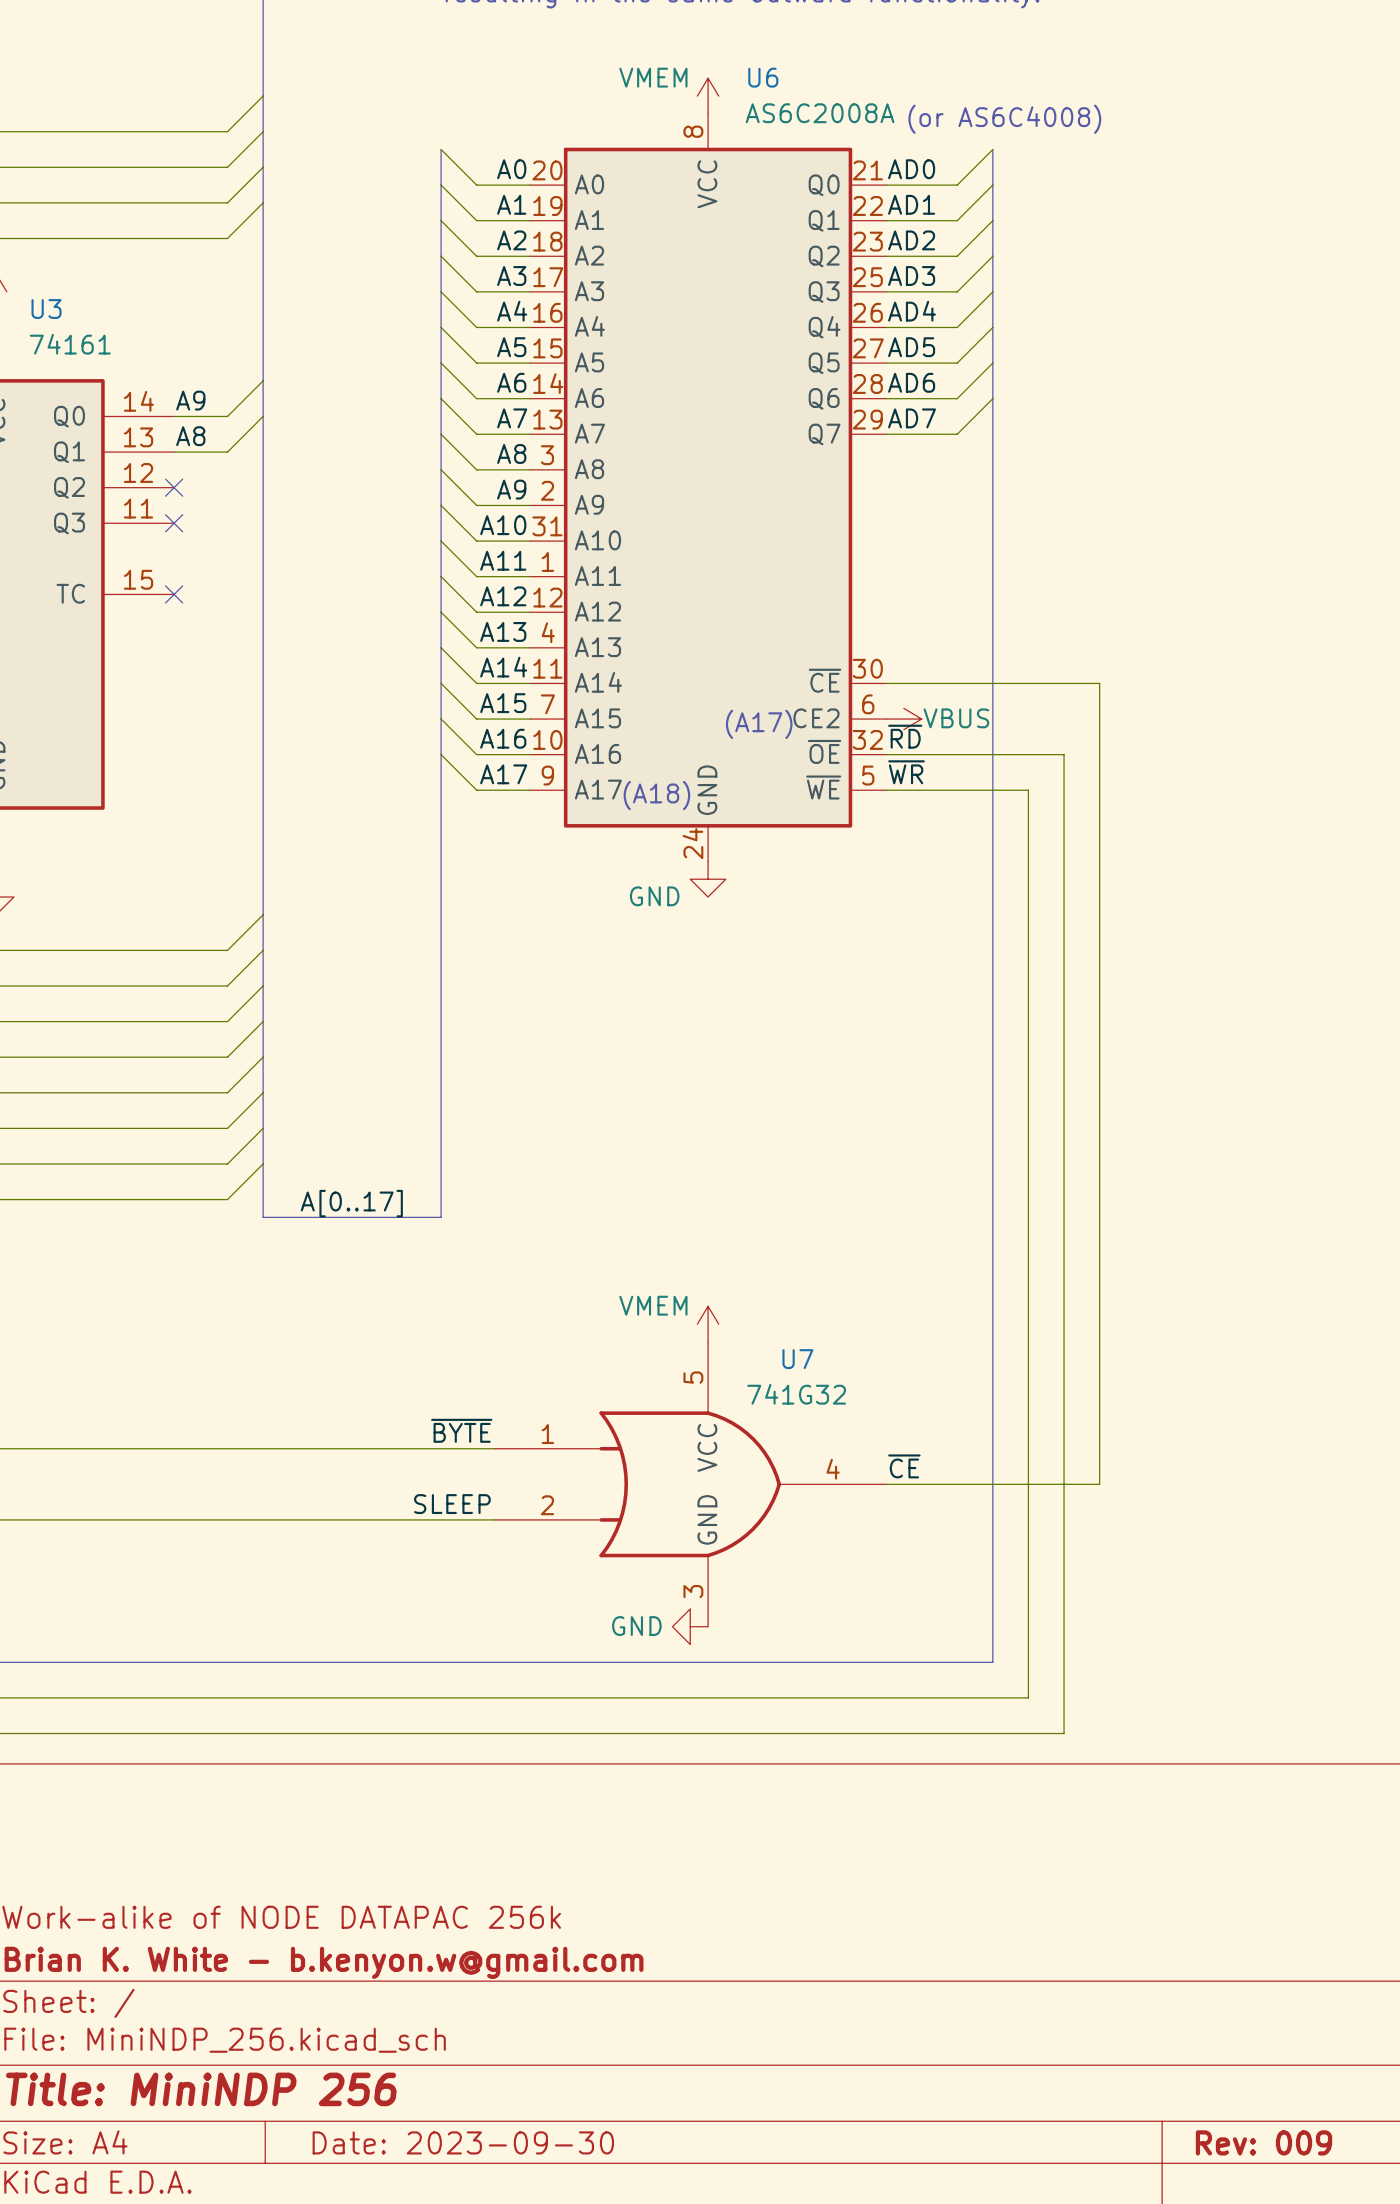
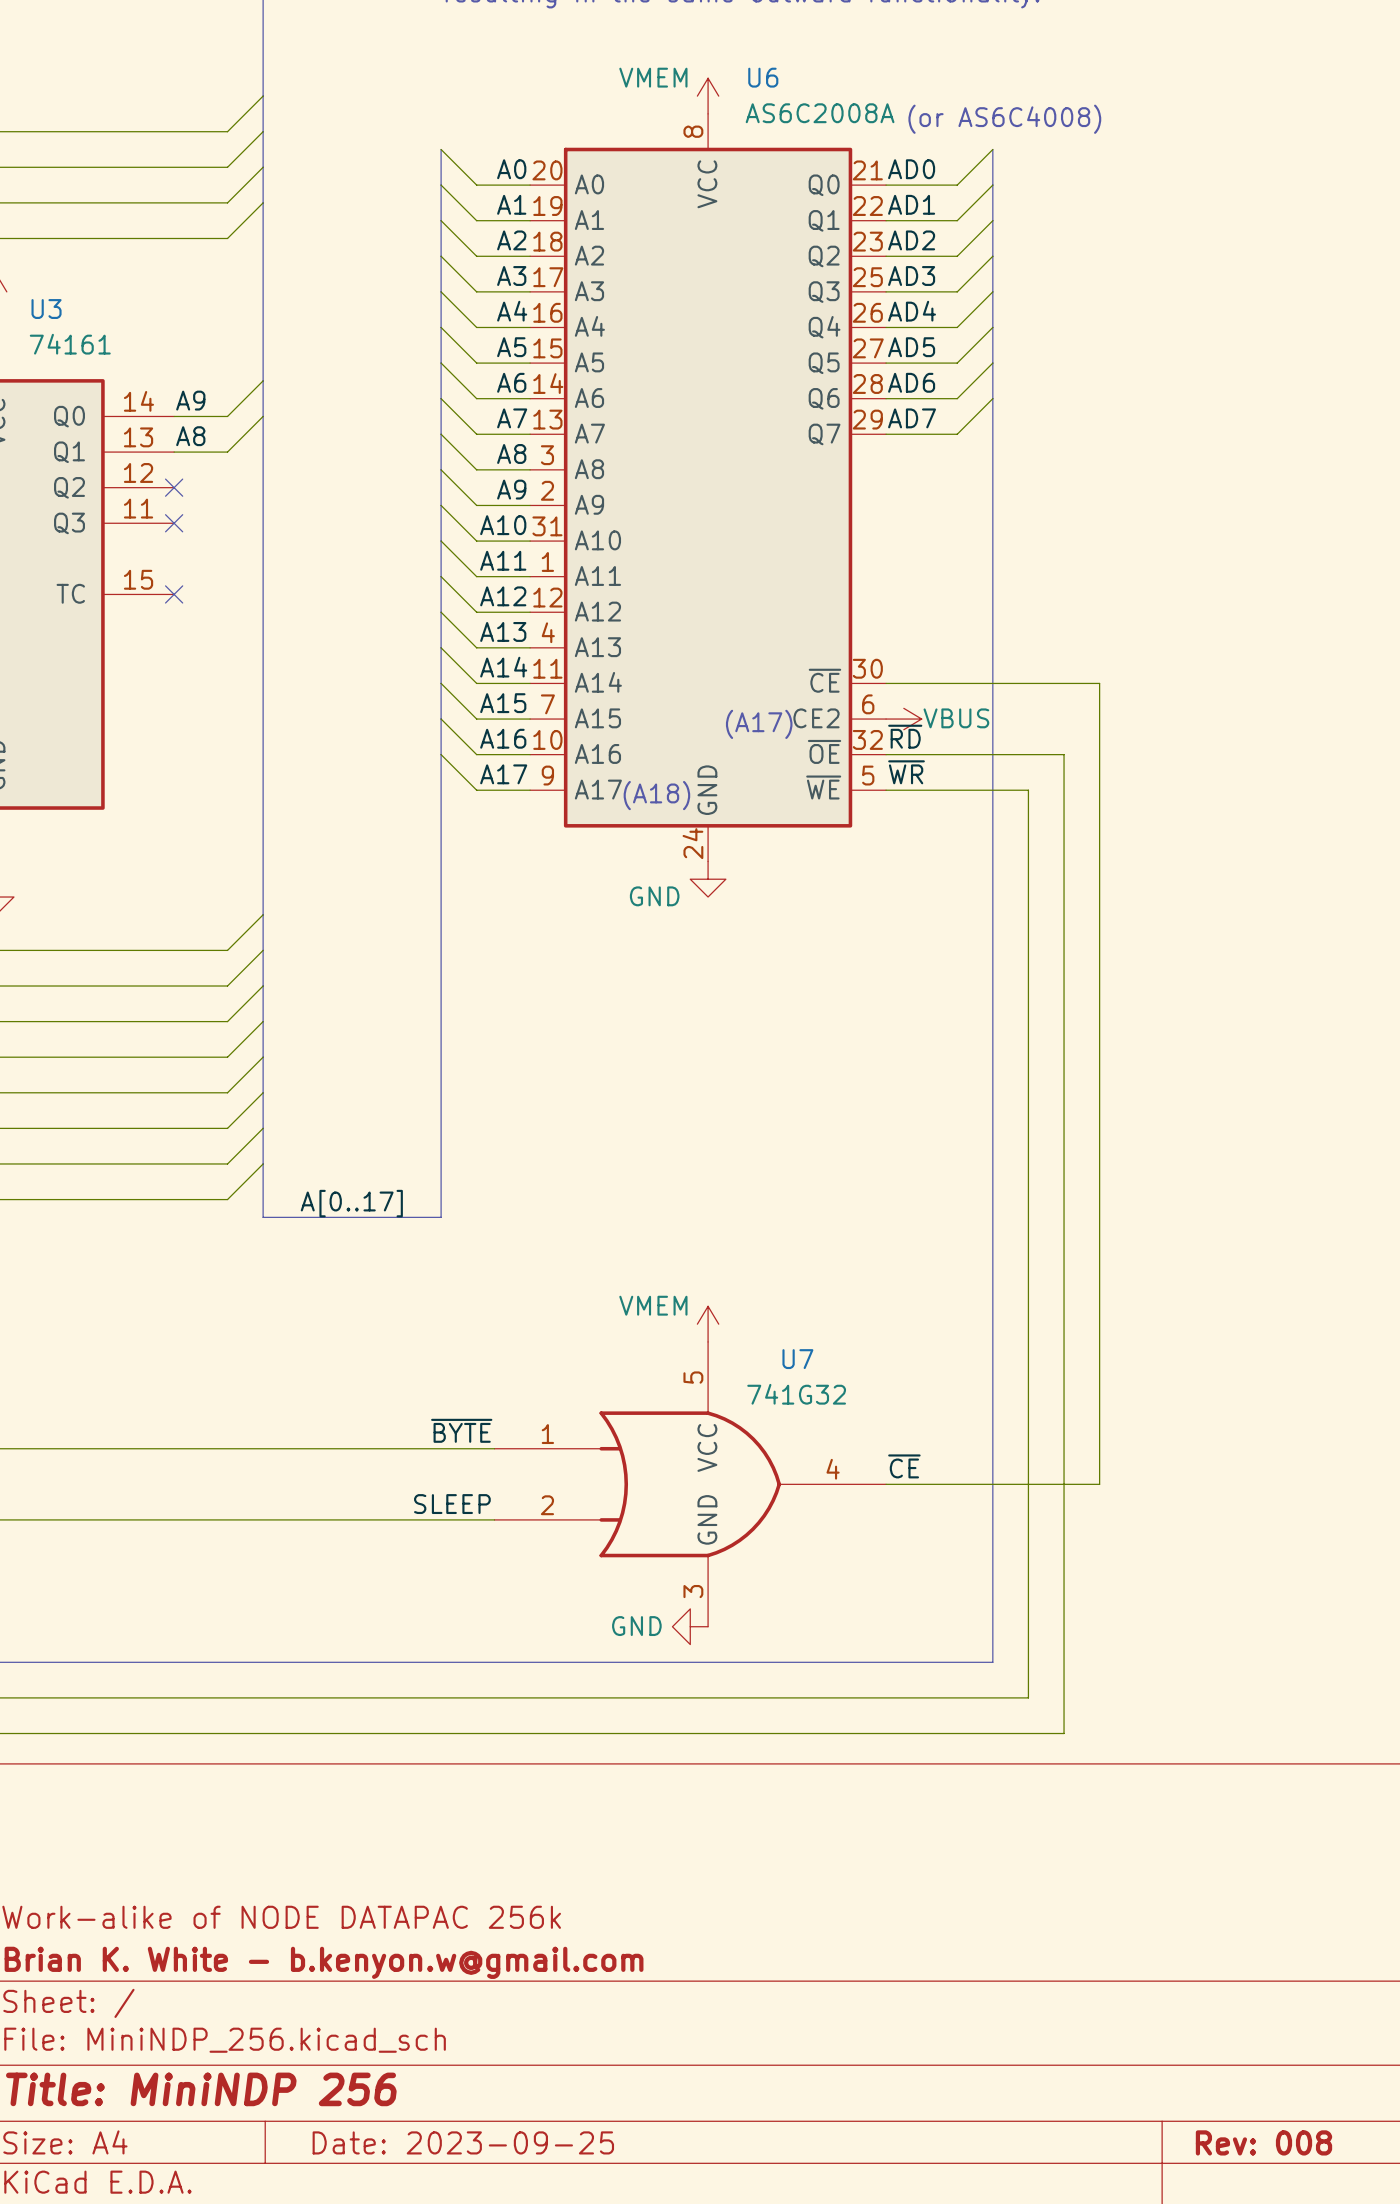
title block: Date: 2023-09-30 (463, 2142) -> Date: 2023-09-25 (463, 2142)
title block: Rev: 009 (1263, 2142) -> Rev: 008 (1263, 2142)

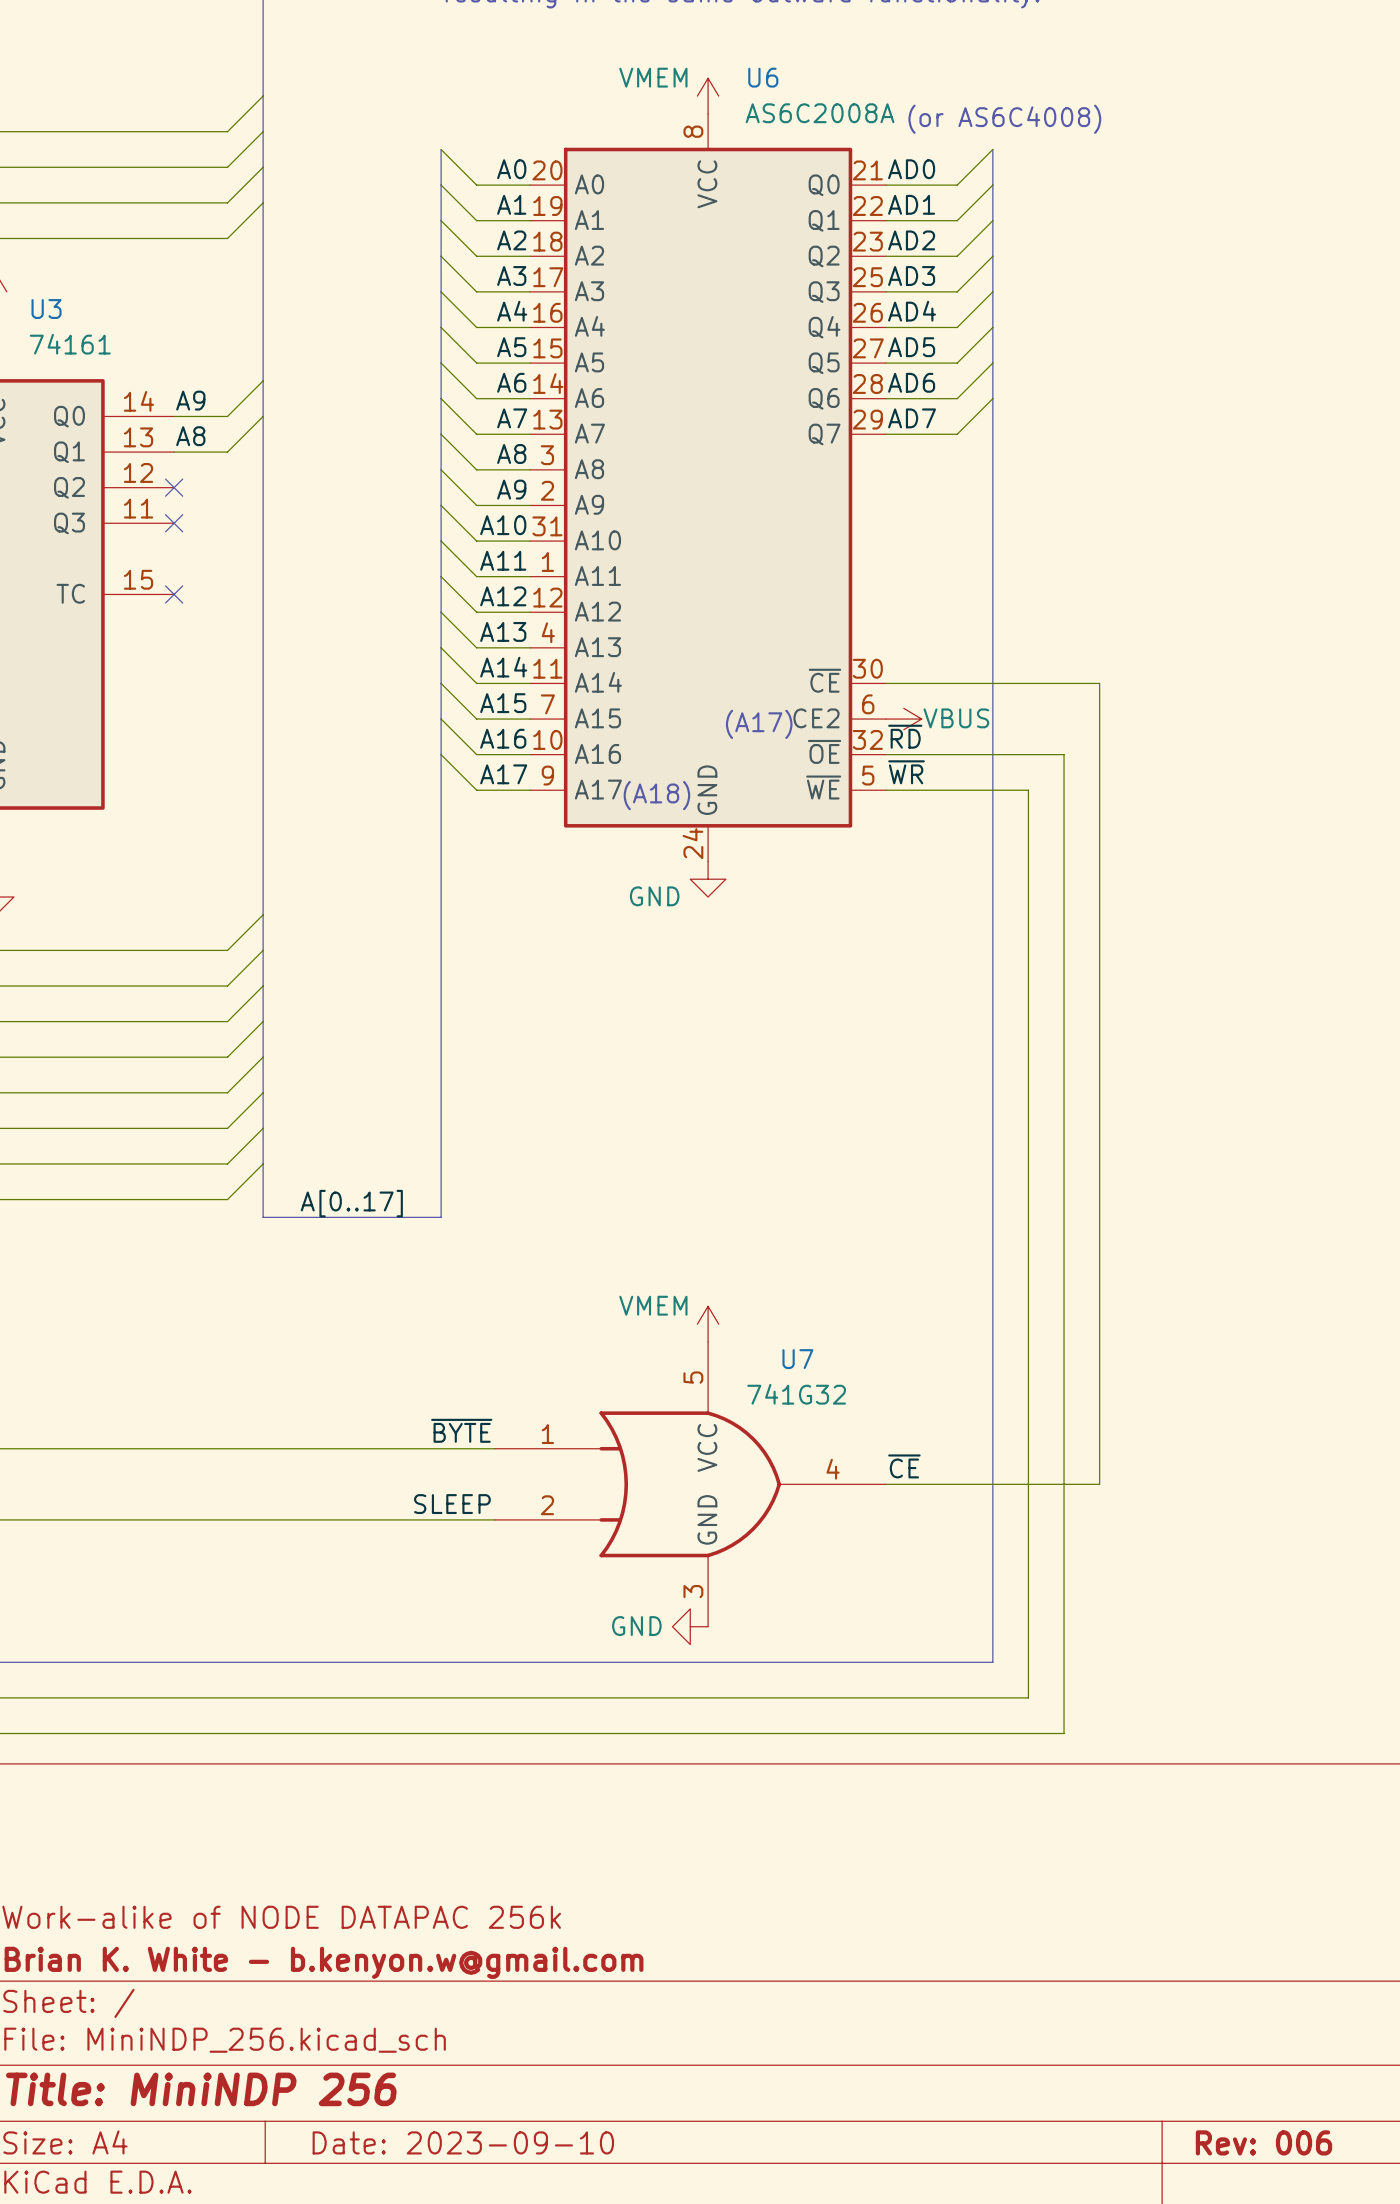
title block: Date: 2023-09-25 (463, 2142) -> Date: 2023-09-10 (463, 2142)
title block: Rev: 008 (1263, 2142) -> Rev: 006 (1263, 2142)

